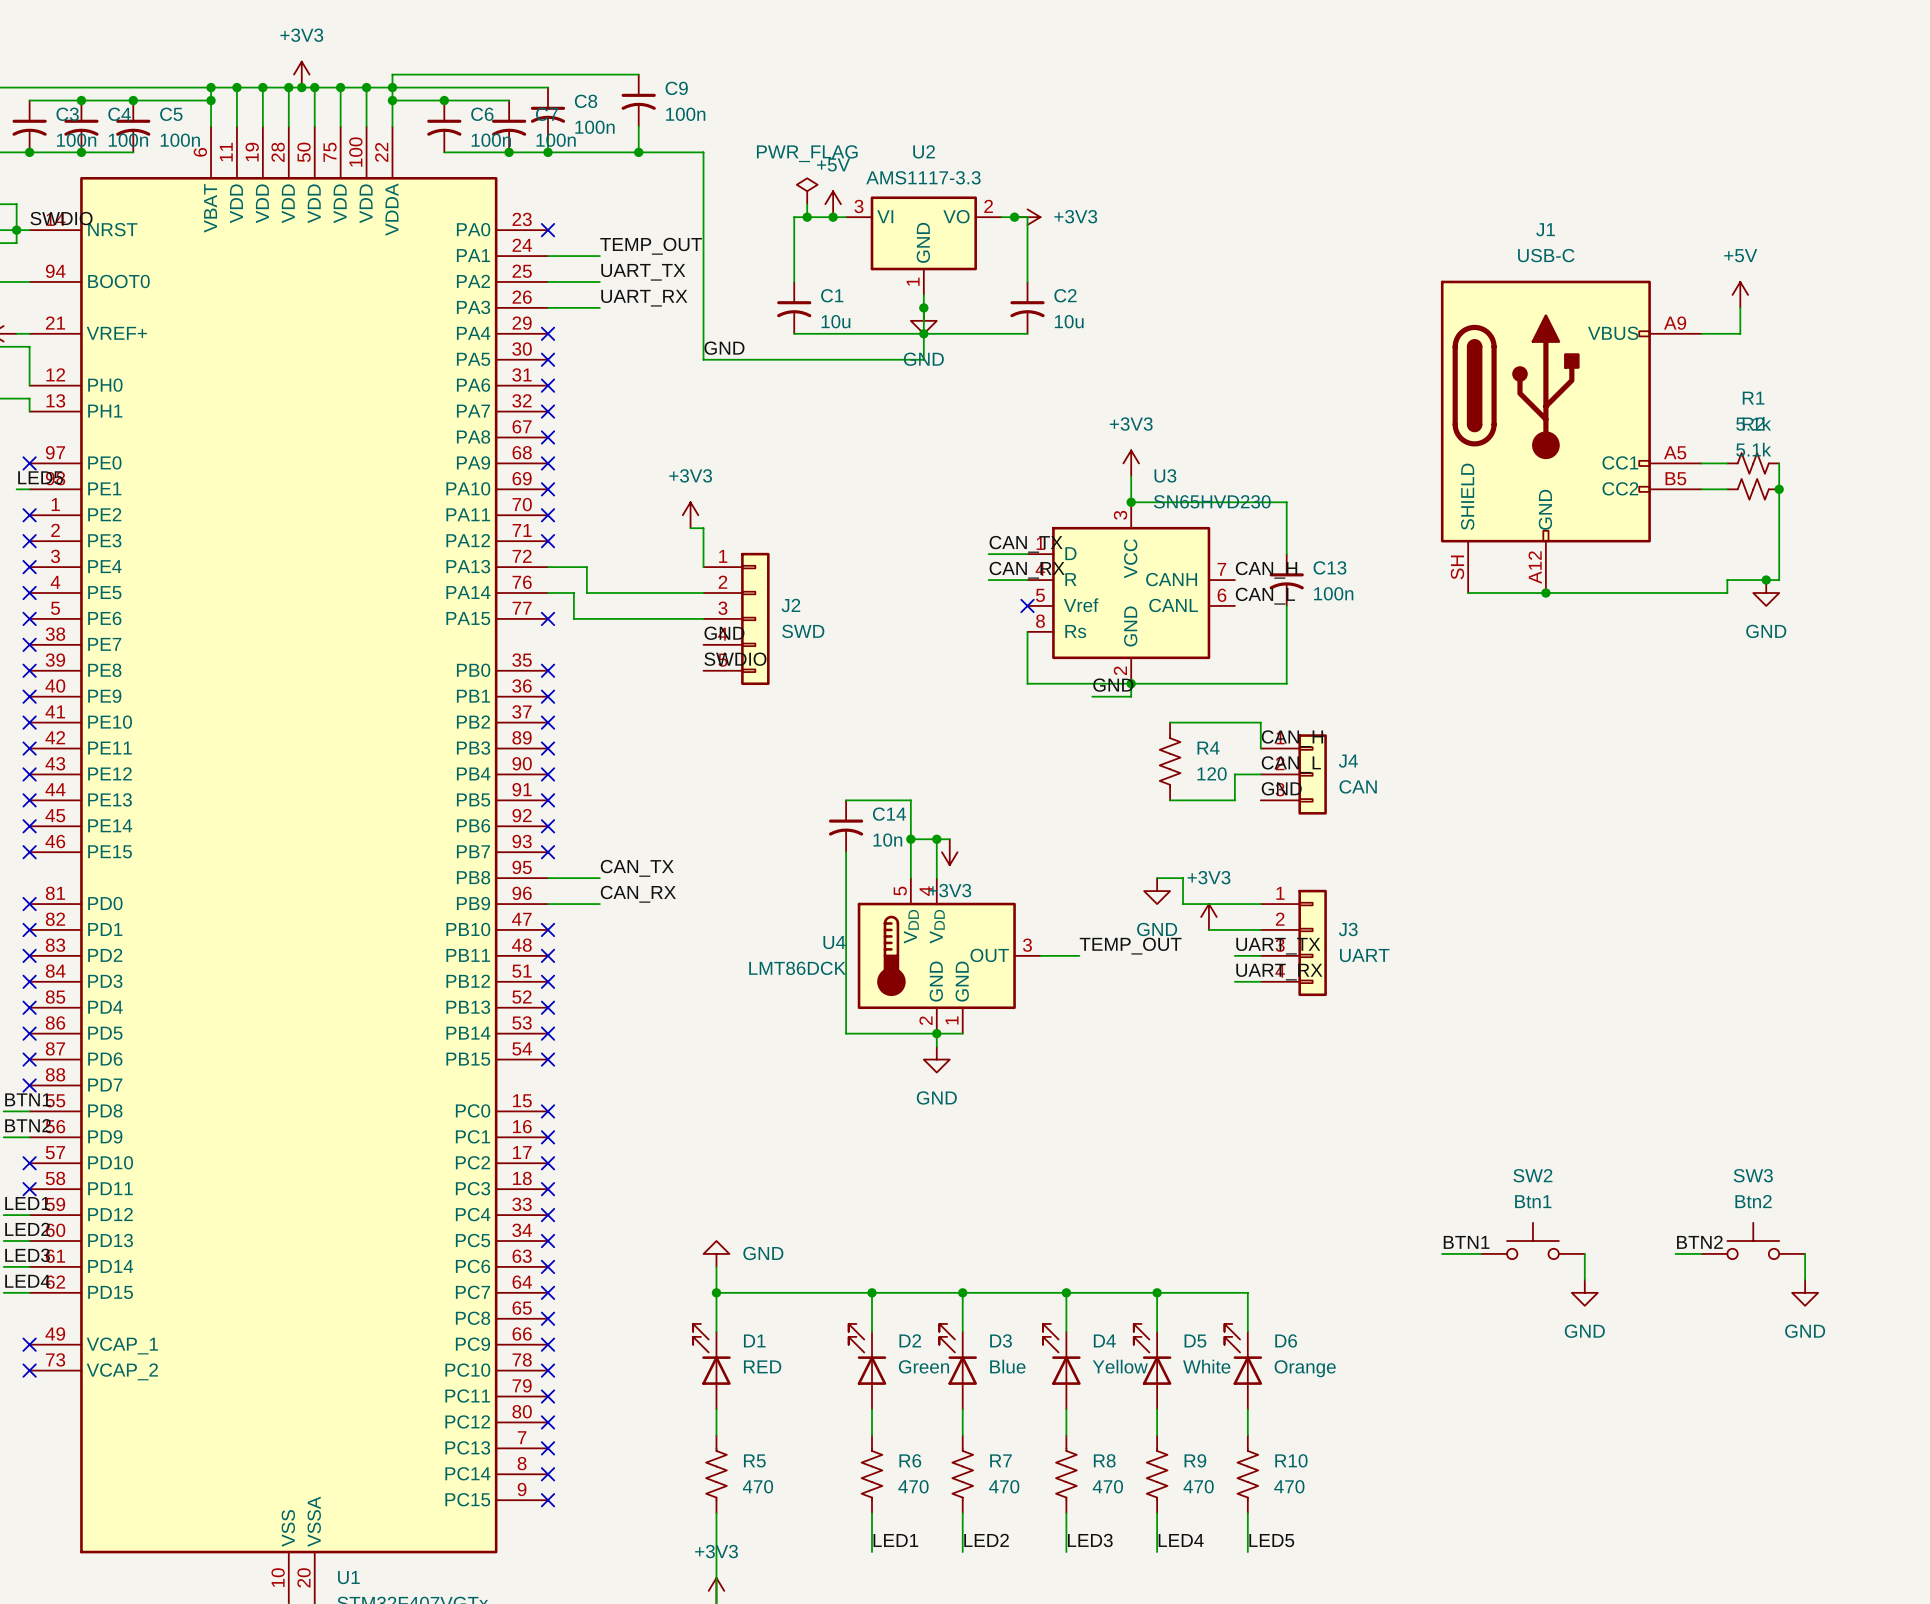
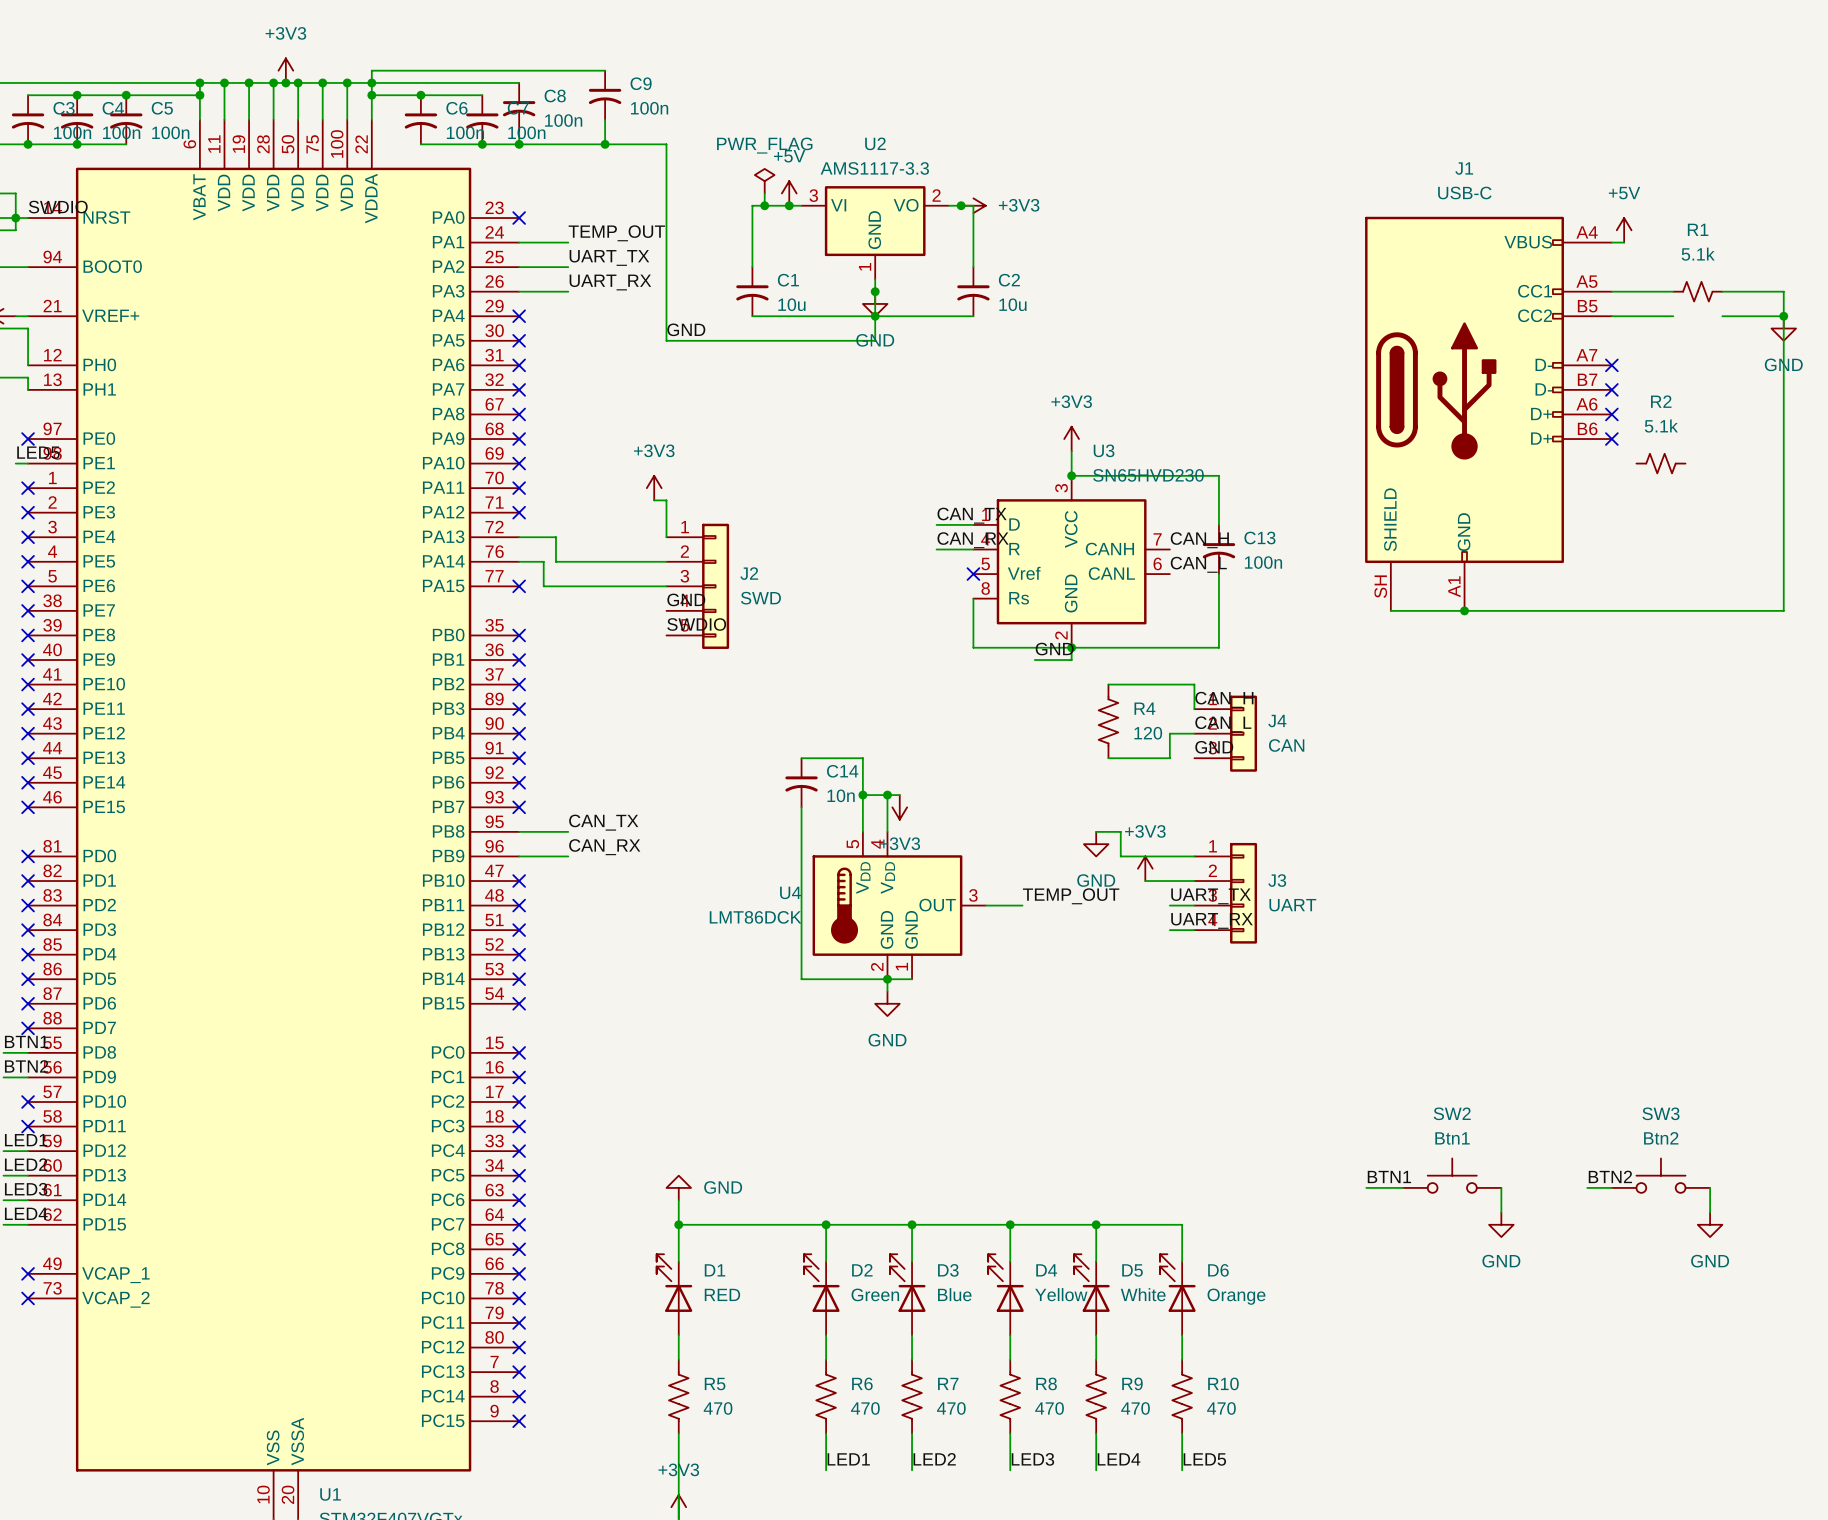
J1 name position: J1 (1545, 229) -> J1 (1464, 168)
J1 value position: USB-C (1546, 255) -> USB-C (1464, 193)
wire: none -> (1611, 242) (1624, 242)
J1 symbol: [1440, 280, 1702, 594] -> [1365, 216, 1612, 611]
power symbol position: +5V (1740, 294) -> +5V (1624, 230)
wire: none -> (1611, 291) (1673, 291)
wire: (1740, 307) (1740, 333) -> (1673, 316) (1648, 316)
wire: none -> (1722, 291) (1783, 291) (1783, 610) (1390, 610)
wire: none -> (1722, 316) (1783, 316)
junction: none -> (1783, 316)
power symbol: none -> GND (1783, 328)
no-connect mark: none -> (1611, 365)
no-connect mark: none -> (1611, 389)
no-connect mark: none -> (1611, 414)
wire: (1701, 463) (1727, 463) -> none
no-connect mark: none -> (1611, 439)
R1 position: (1753, 463) -> (1697, 291)
wire: (1779, 463) (1779, 580) (1727, 580) (1727, 593) (1468, 593) -> none
wire: (1701, 489) (1727, 489) -> none
junction: (1779, 489) -> none
junction: (1766, 580) -> none
junction position: (1545, 593) -> (1464, 610)
power symbol: GND (1766, 593) -> none

